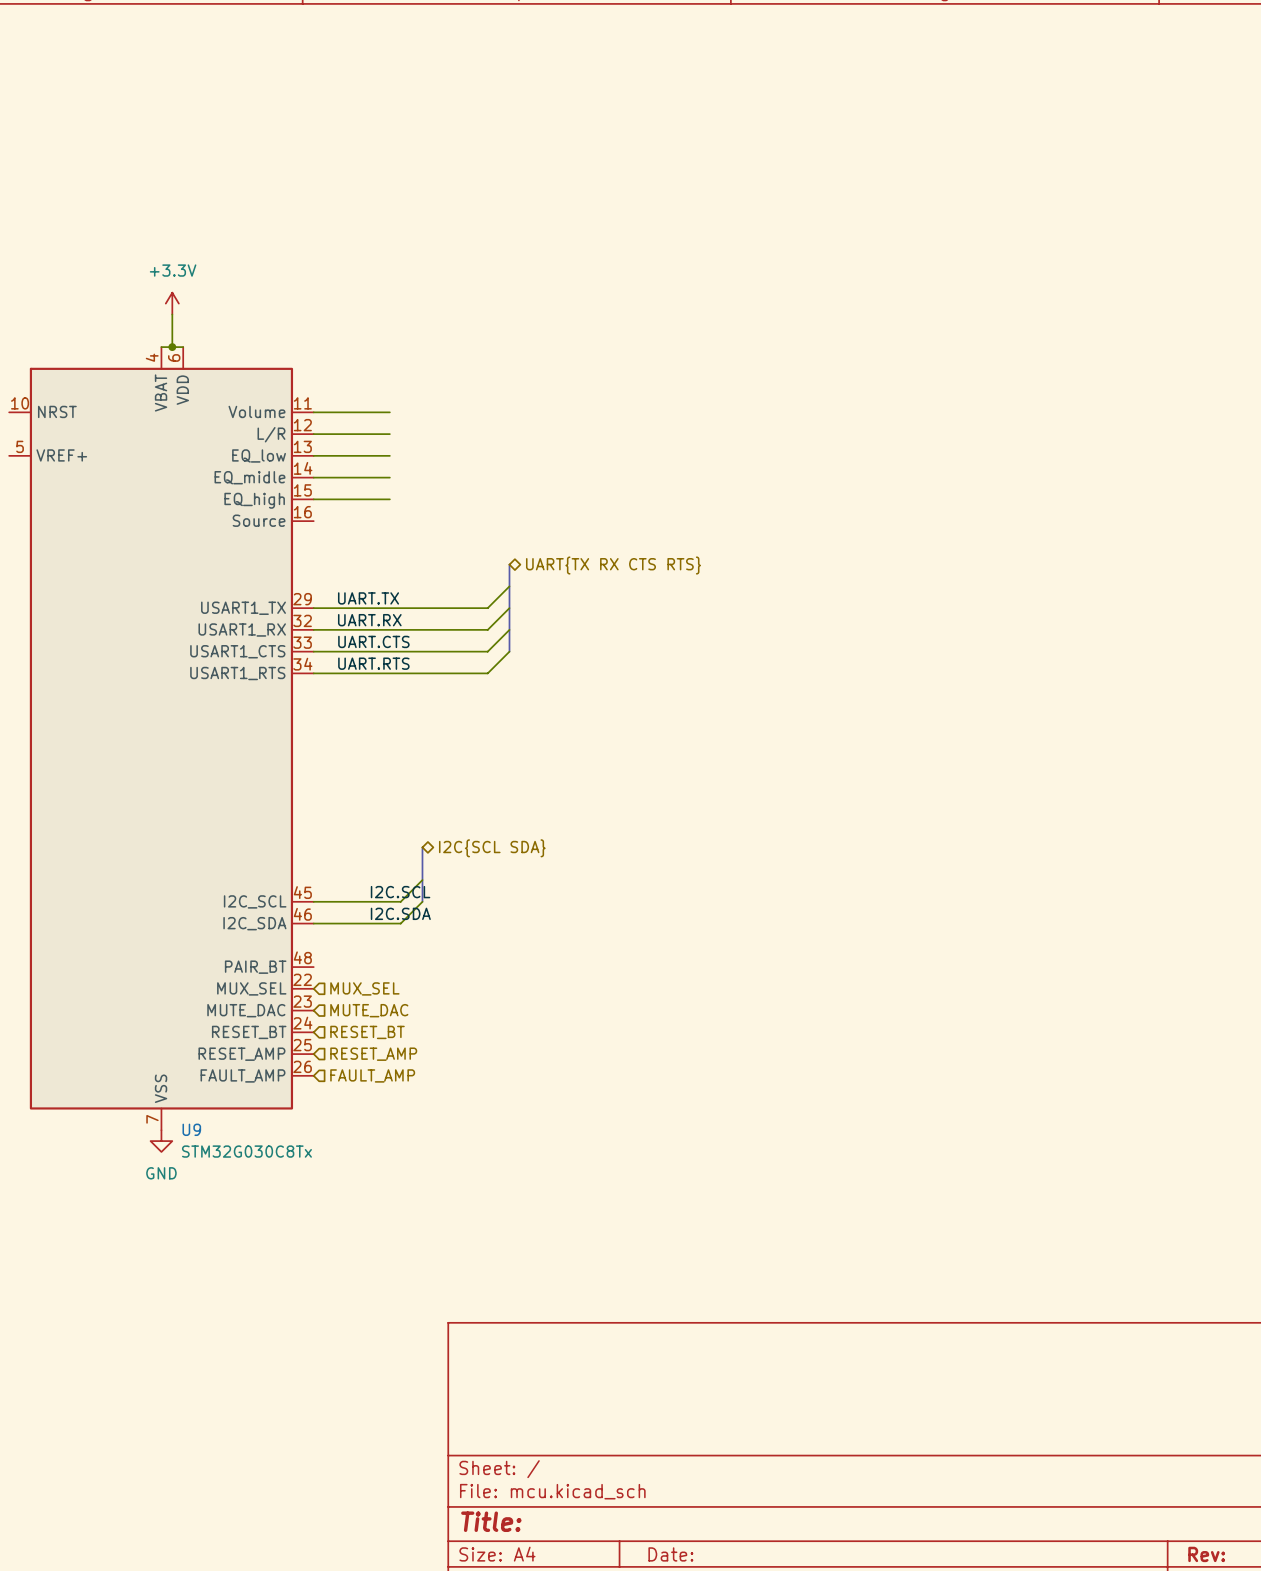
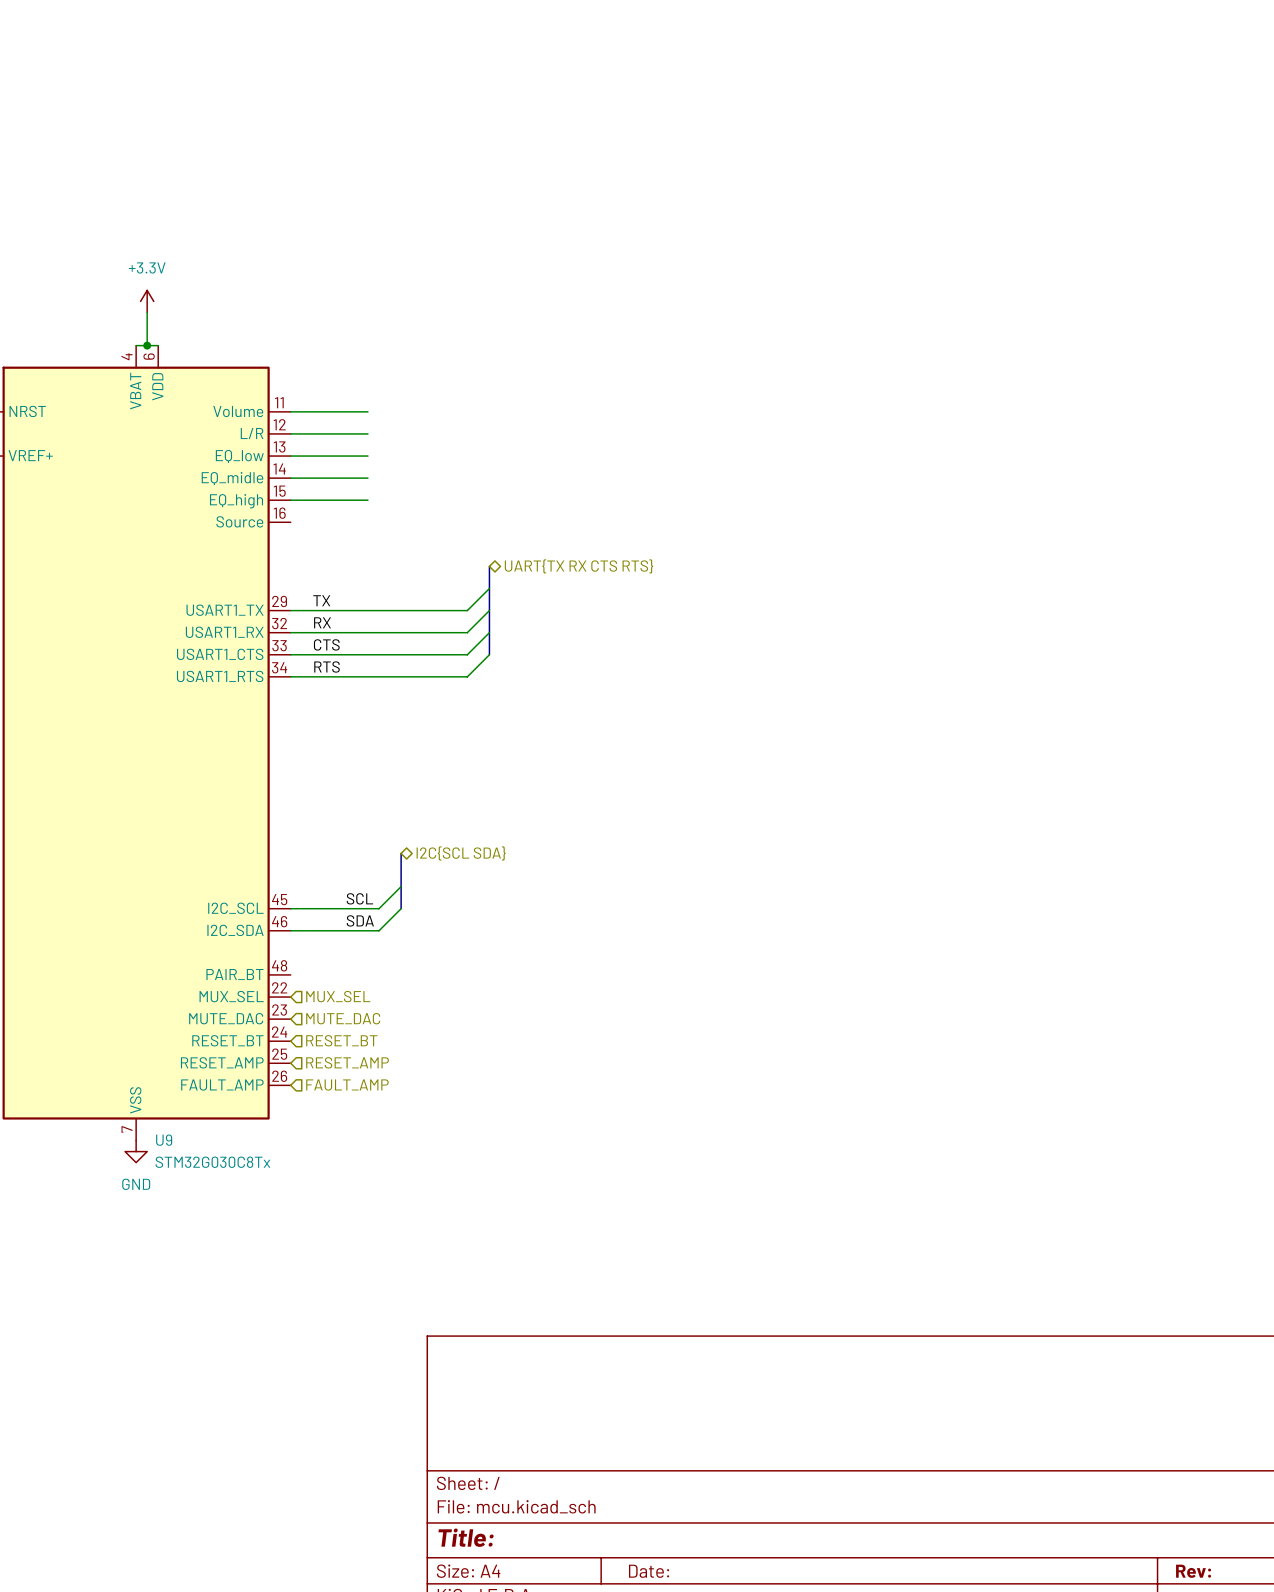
label: UART.TX (368, 598) -> TX (321, 600)
label: UART.RX (369, 620) -> RX (322, 622)
label: UART.CTS (373, 641) -> CTS (326, 644)
label: UART.RTS (373, 663) -> RTS (327, 666)
label: I2C.SCL (400, 892) -> SCL (359, 898)
label: I2C.SDA (400, 913) -> SDA (360, 920)

